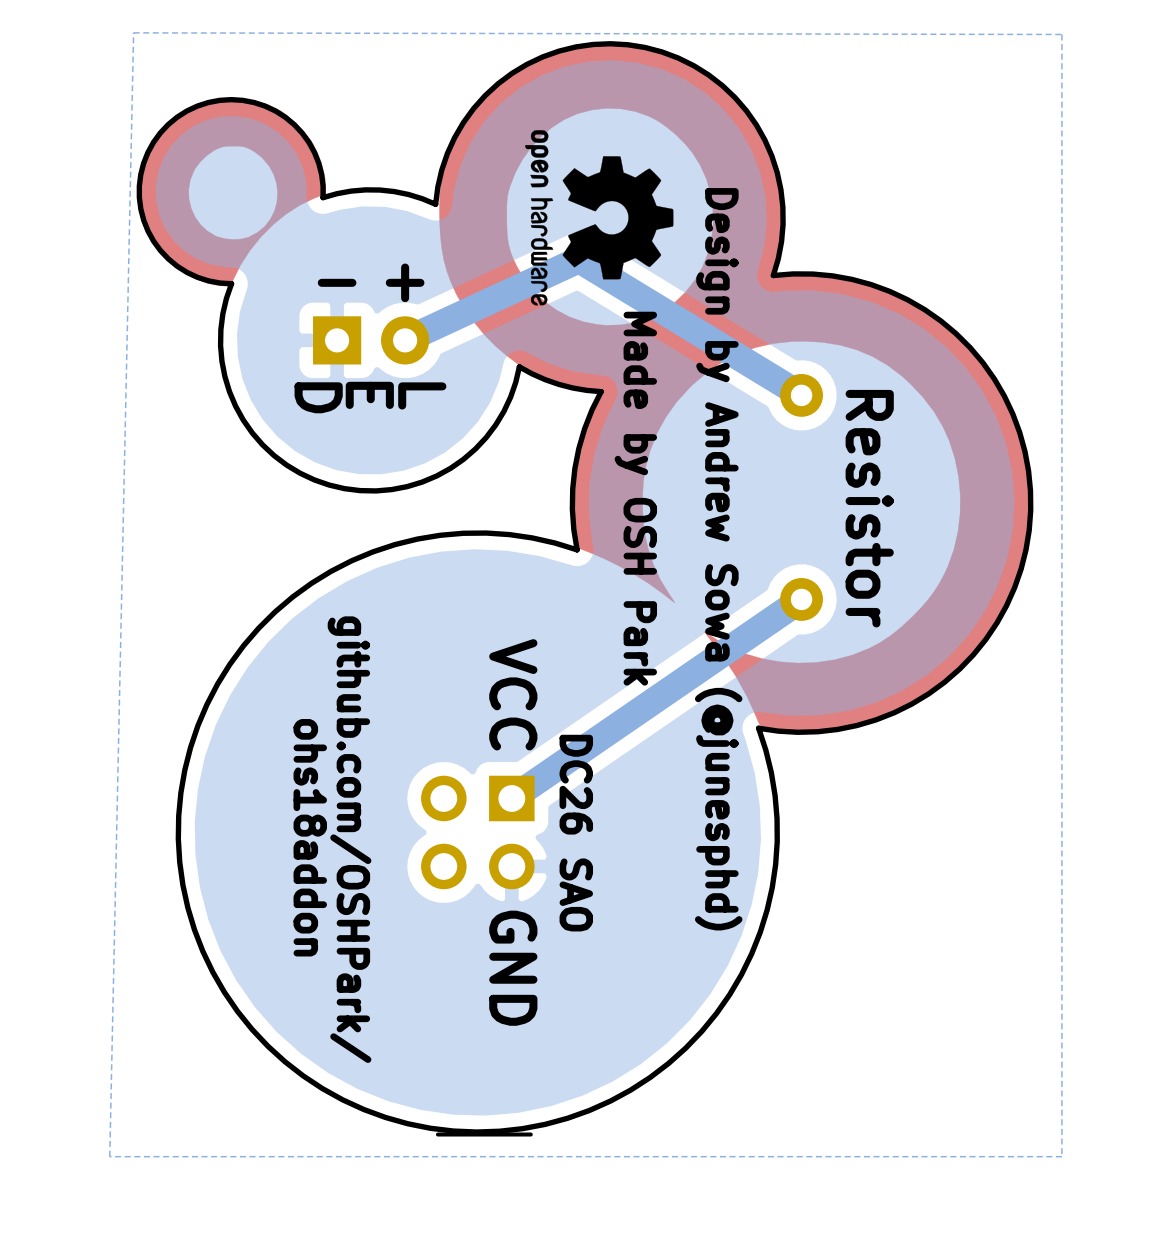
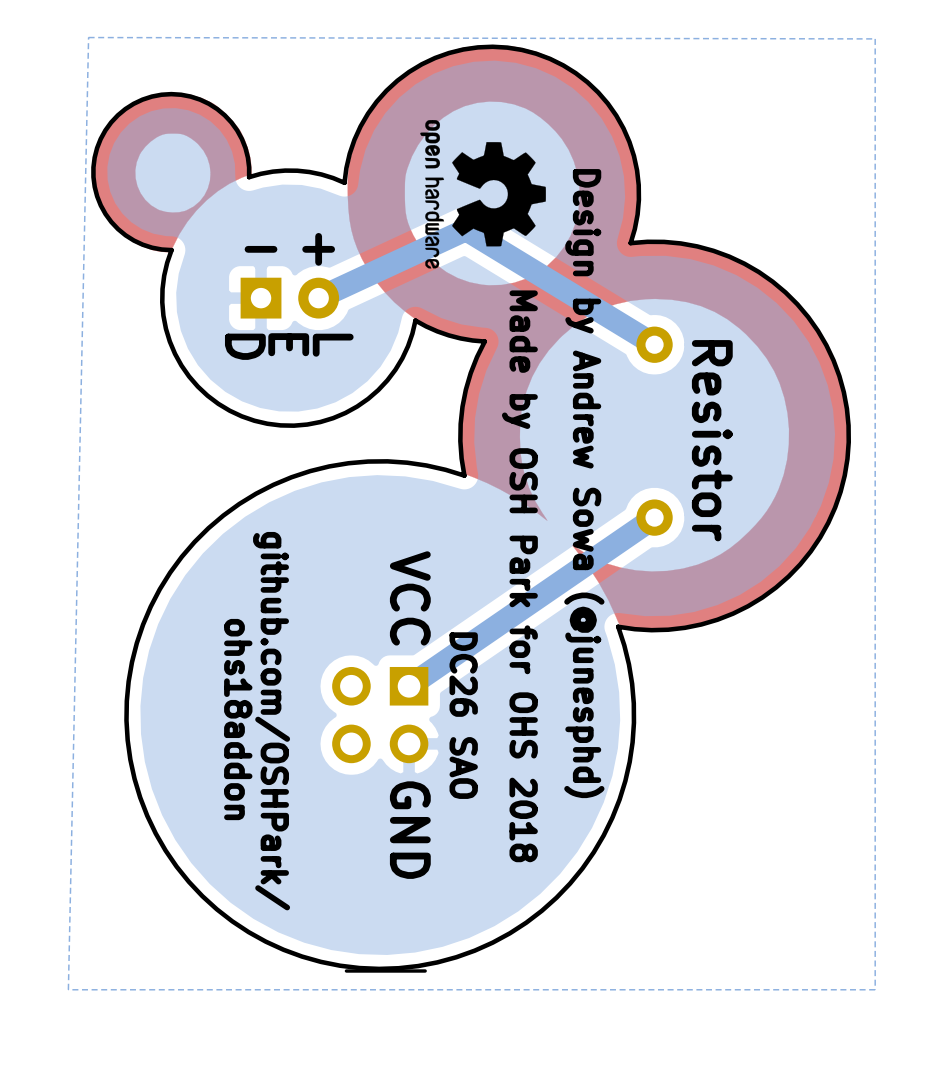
text: Made by OSH Park (635, 498) -> Made by OSH Park for OHS 2018 (519, 576)

